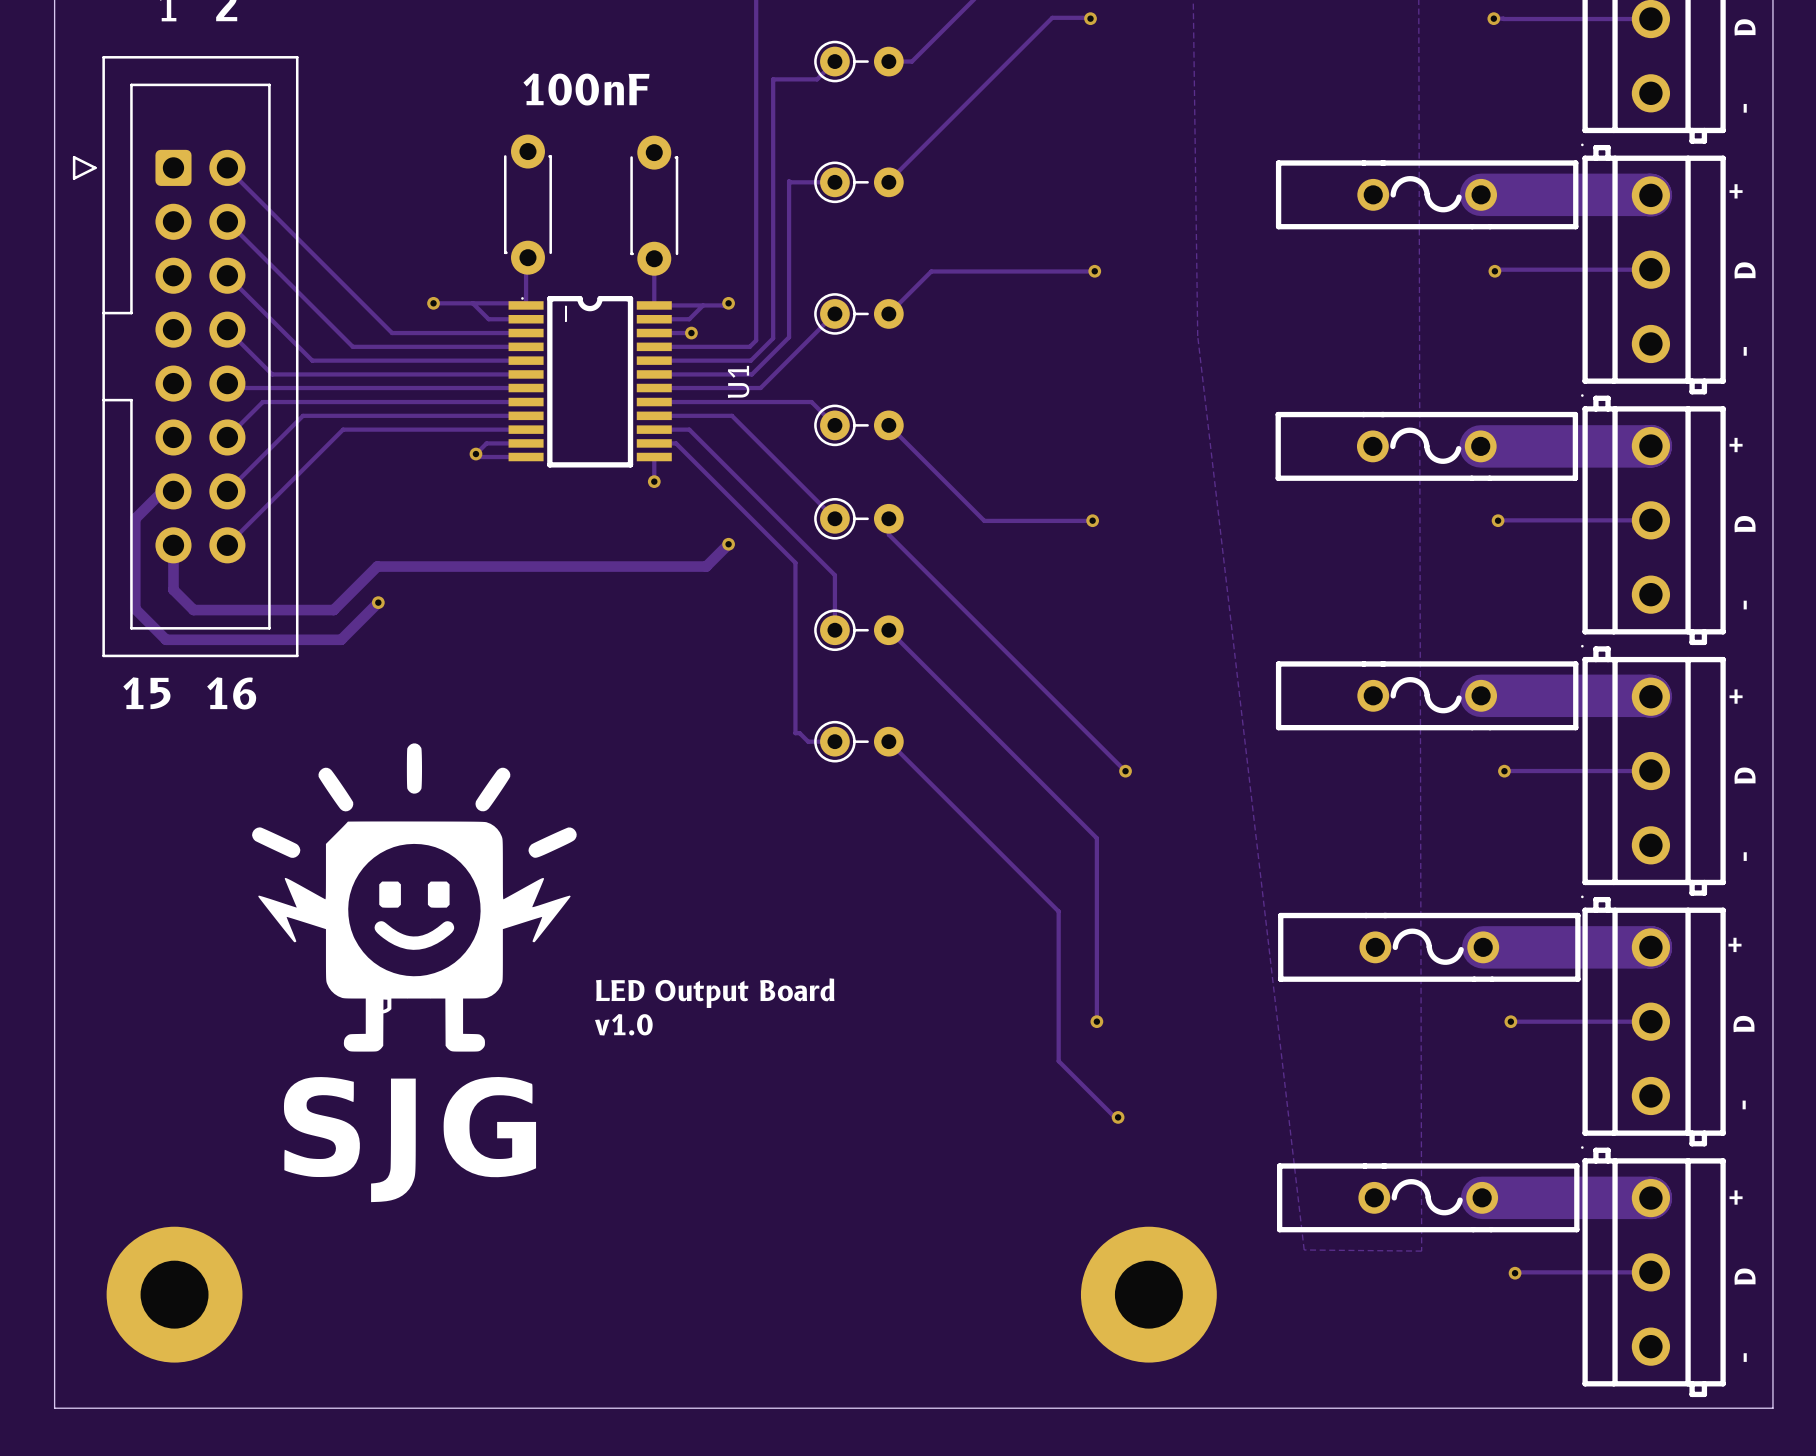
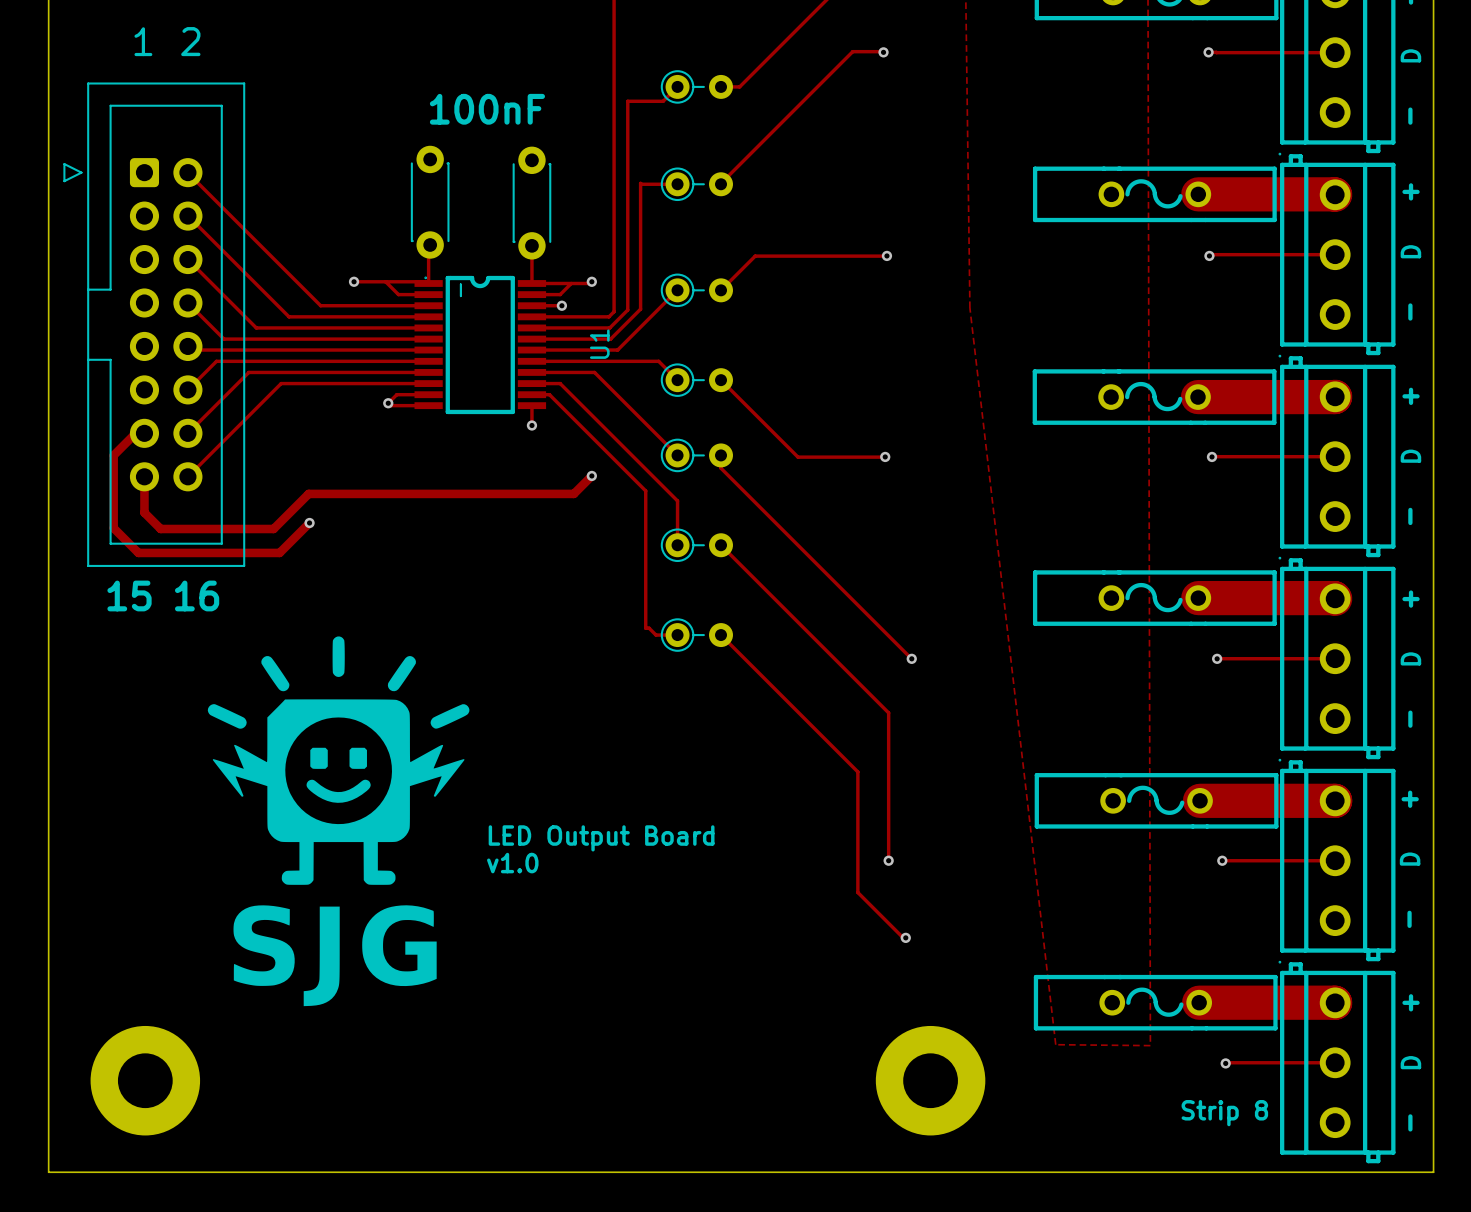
drawing: none -> [207, 636, 470, 1007]
part: (414, 972) -> none
text: none -> Strip 8 (1224, 1113)

